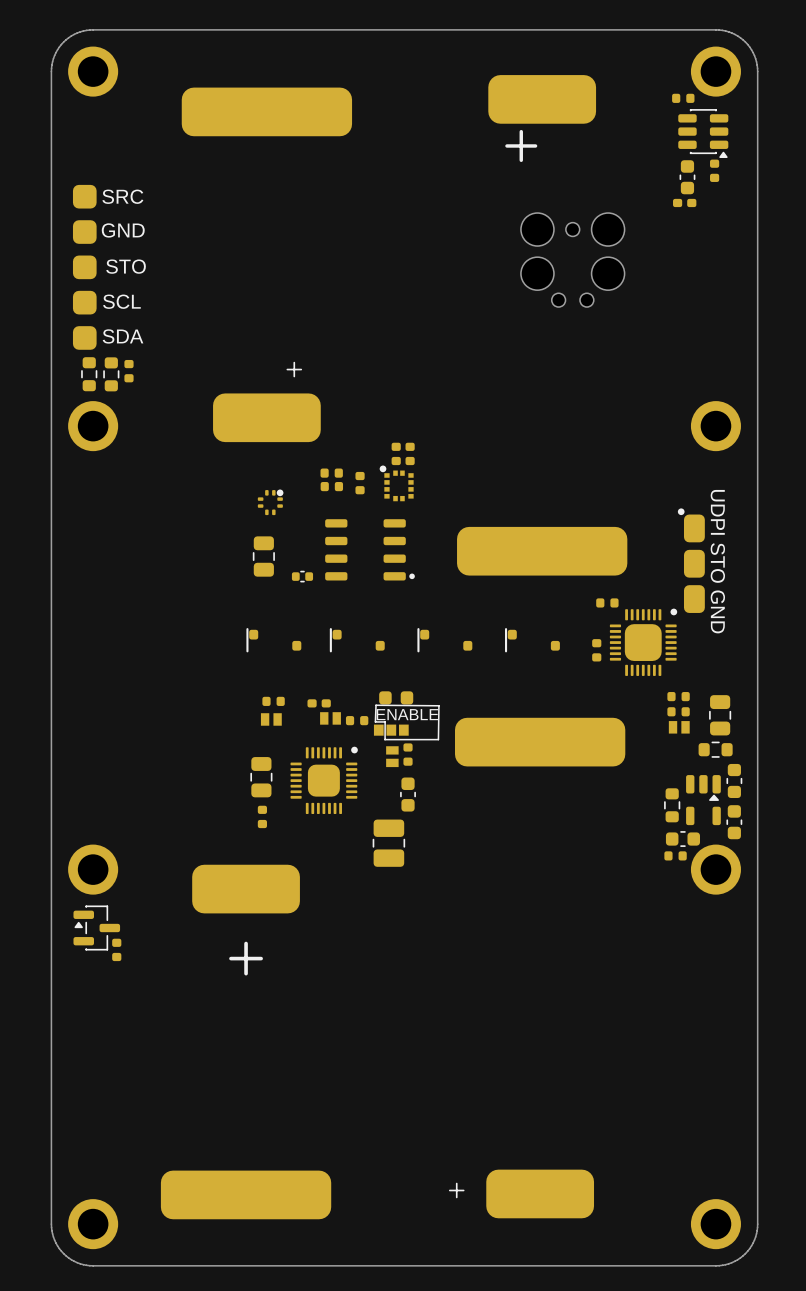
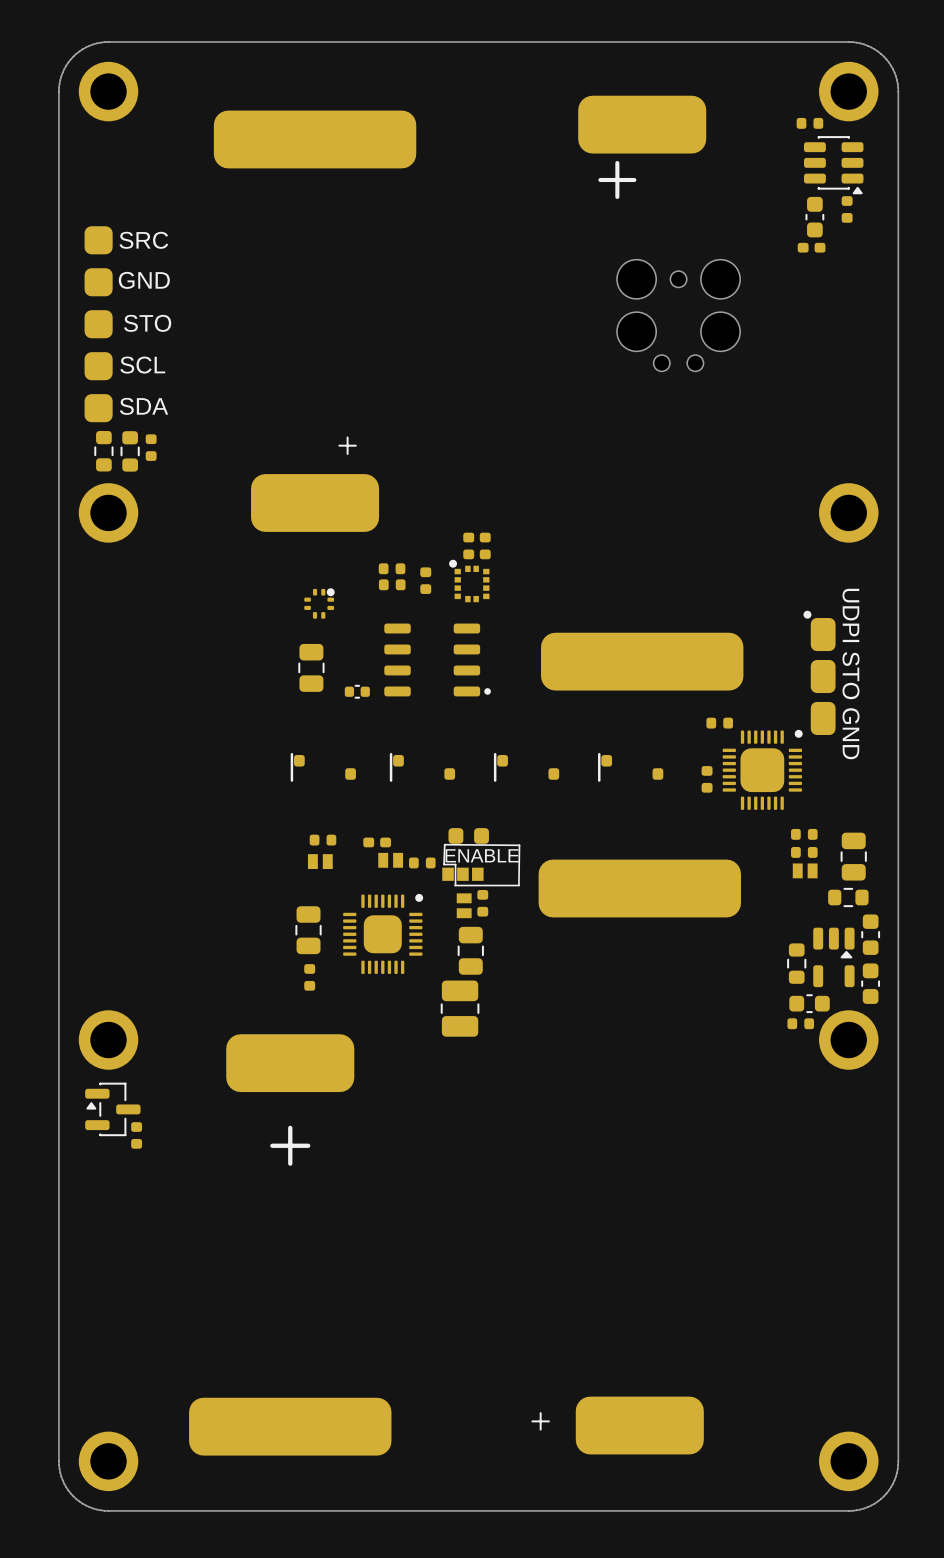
part footprint: [400, 777, 416, 812] -> [457, 926, 484, 975]

